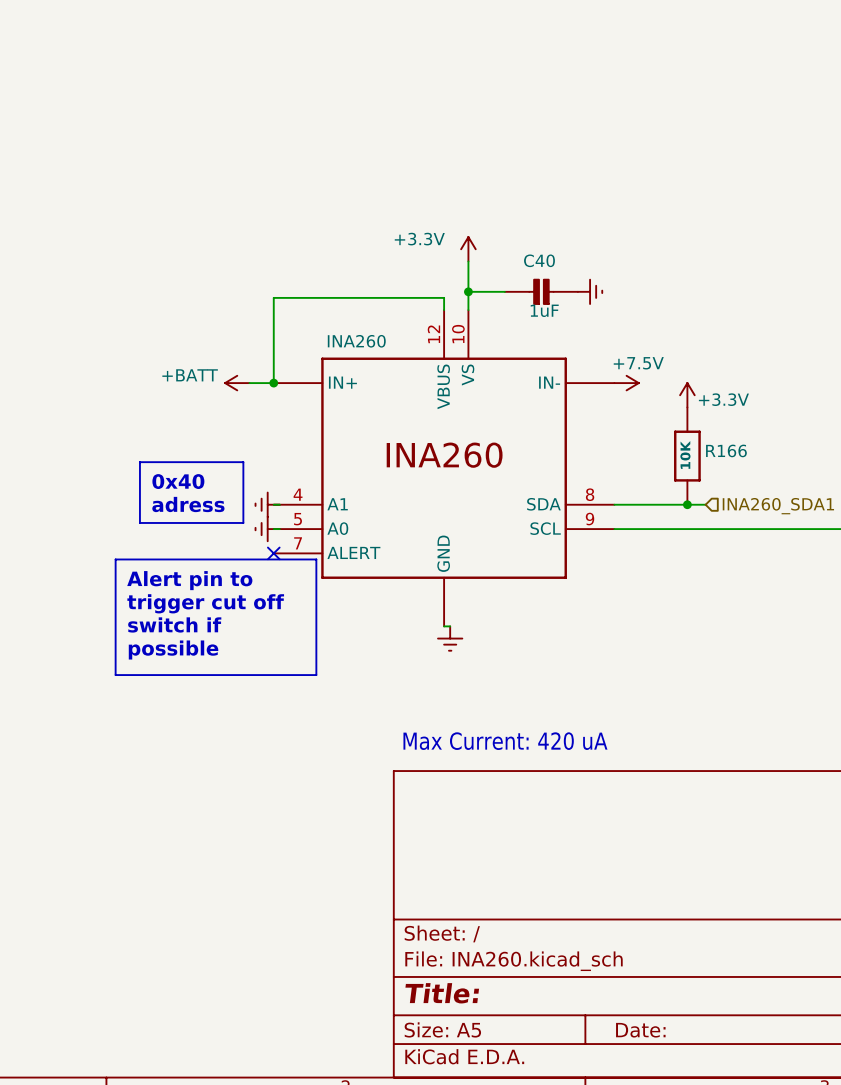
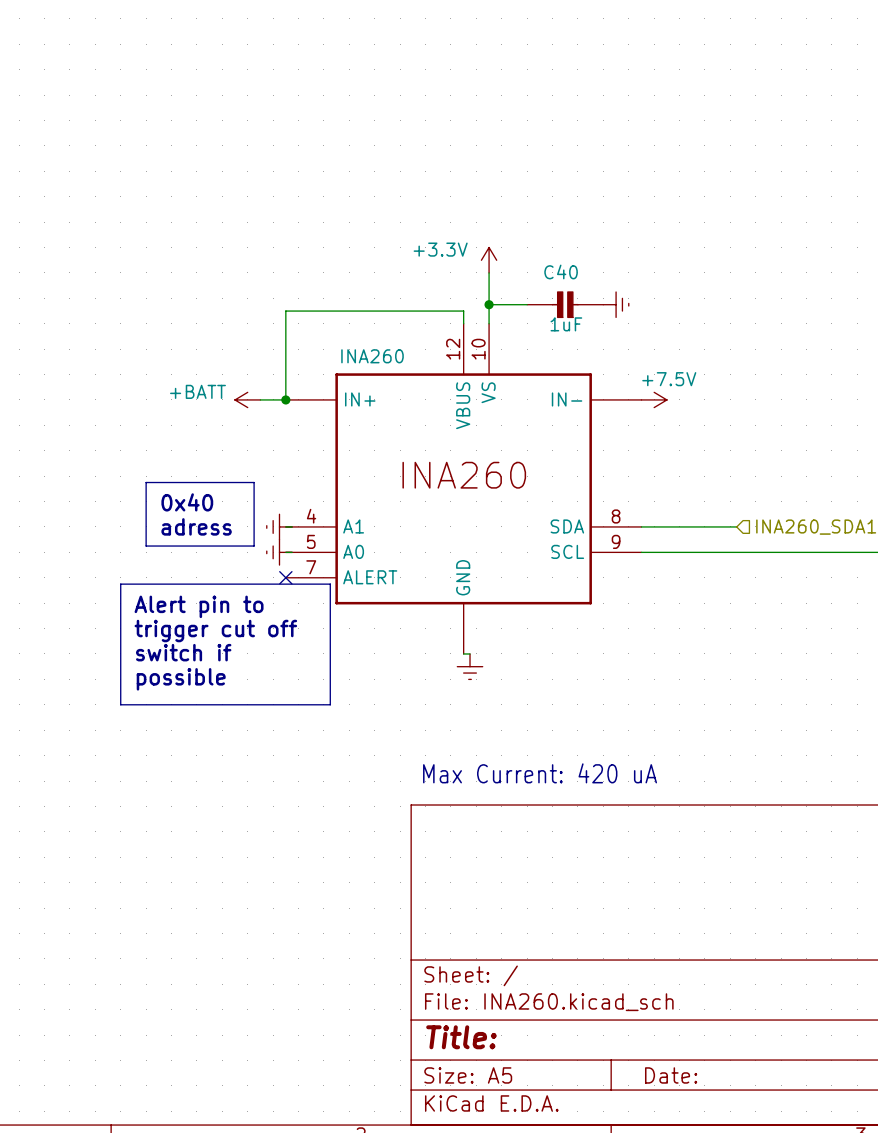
power symbol: +3.3V (687, 395) -> none
R166: 10K (687, 456) -> none
junction: (687, 504) -> none

